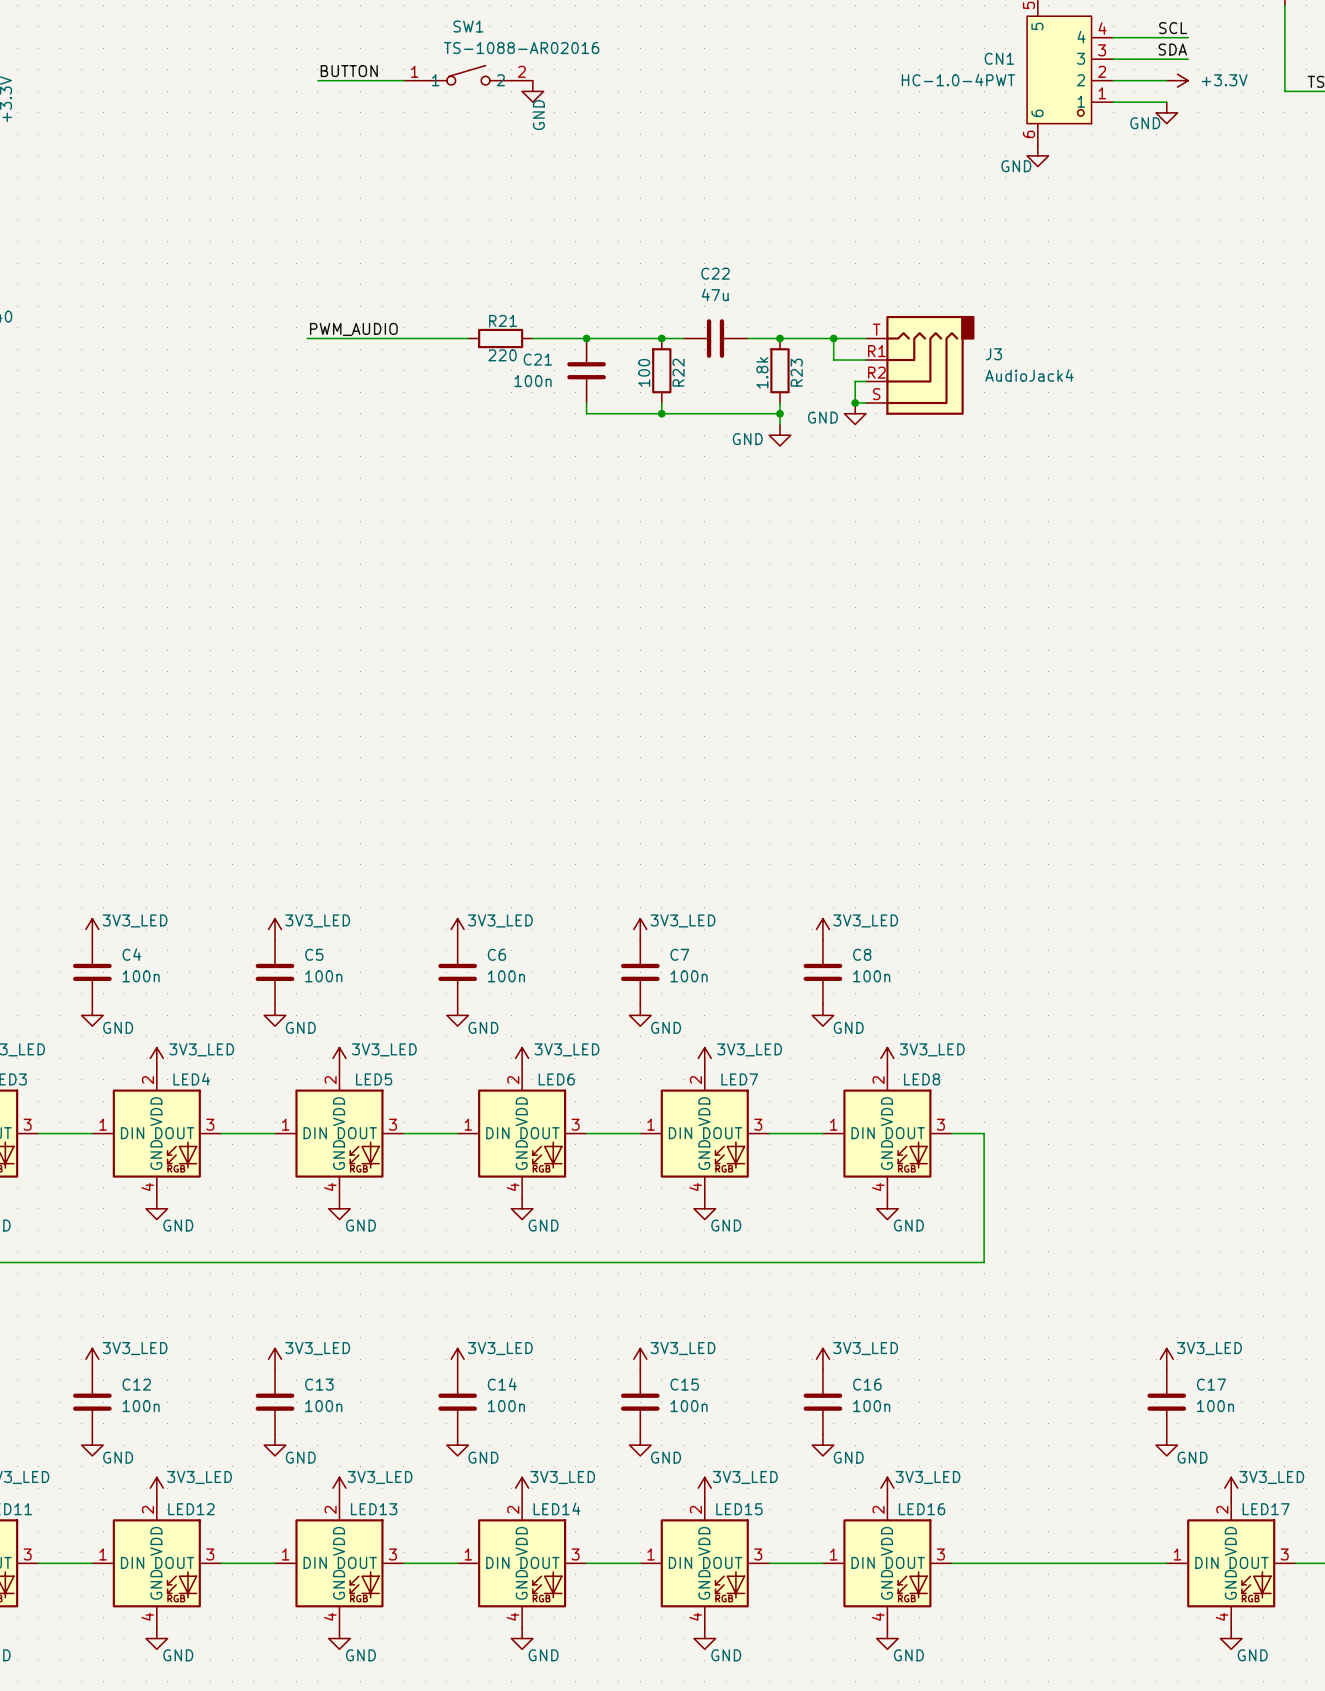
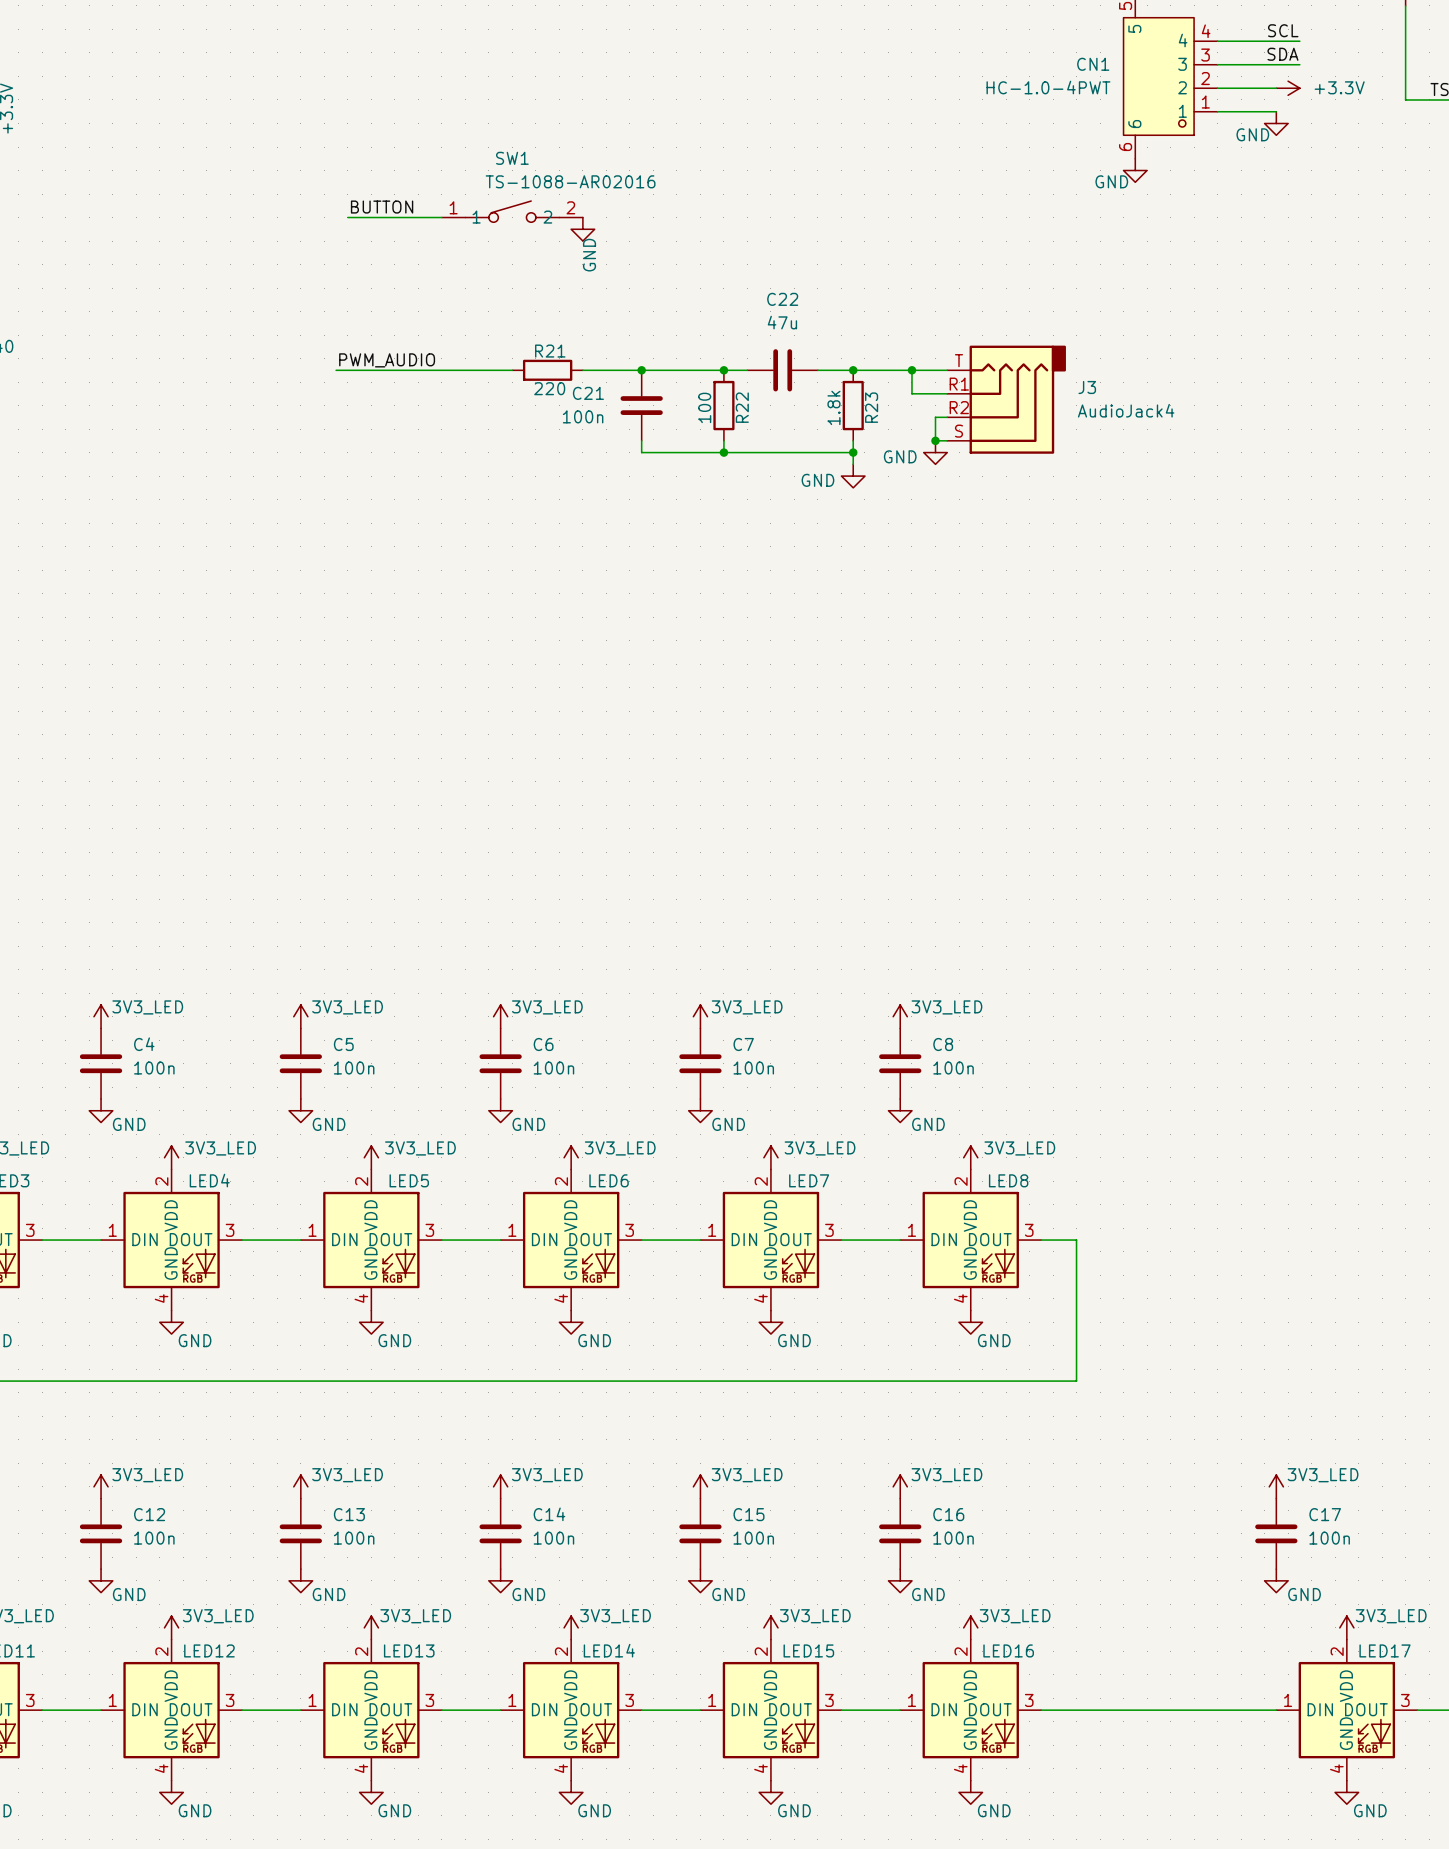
label position: BUTTON (349, 71) -> BUTTON (382, 207)
SW1 position: (468, 75) -> (512, 211)
wire: (317, 80) (403, 80) -> (347, 217) (441, 217)
power symbol position: GND (532, 91) -> GND (582, 229)

